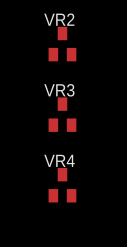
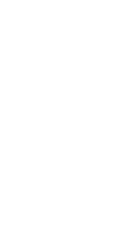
VR2: (62, 44) -> none
VR3: (62, 114) -> none
VR4: (62, 185) -> none

